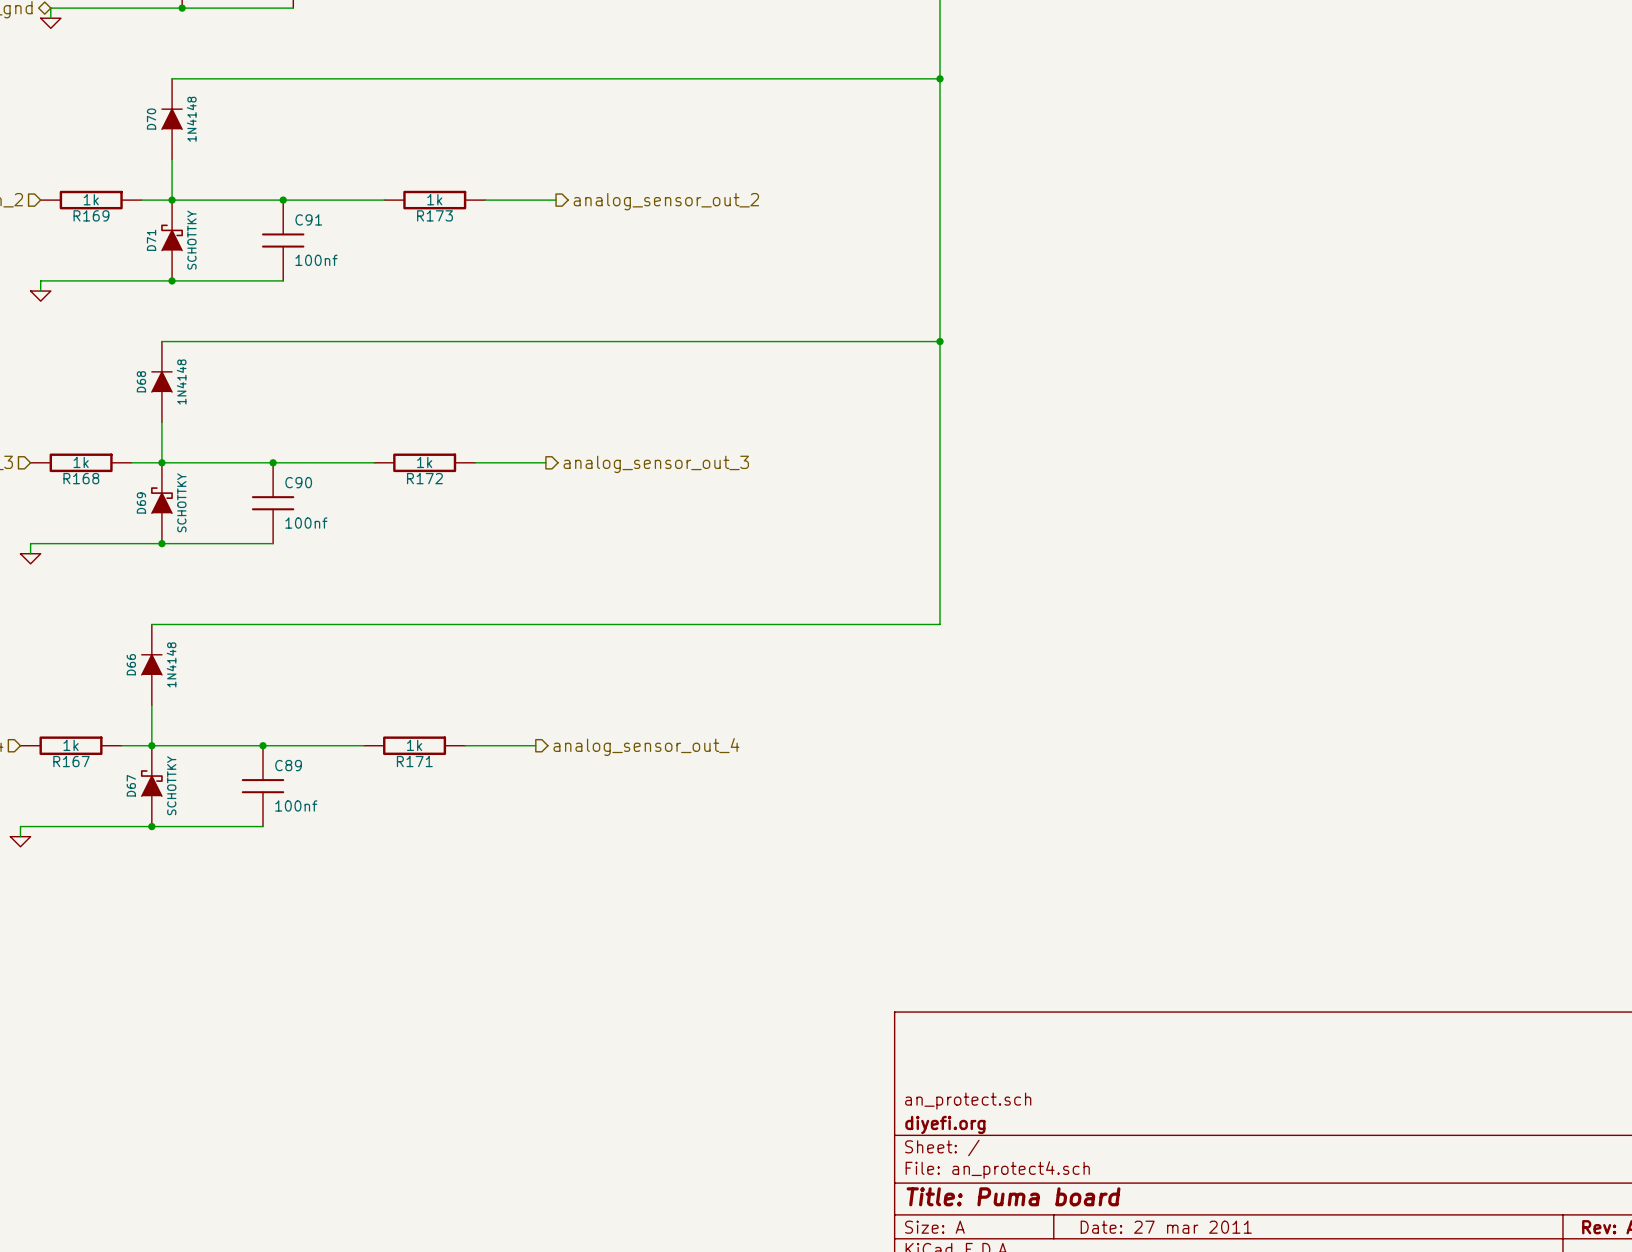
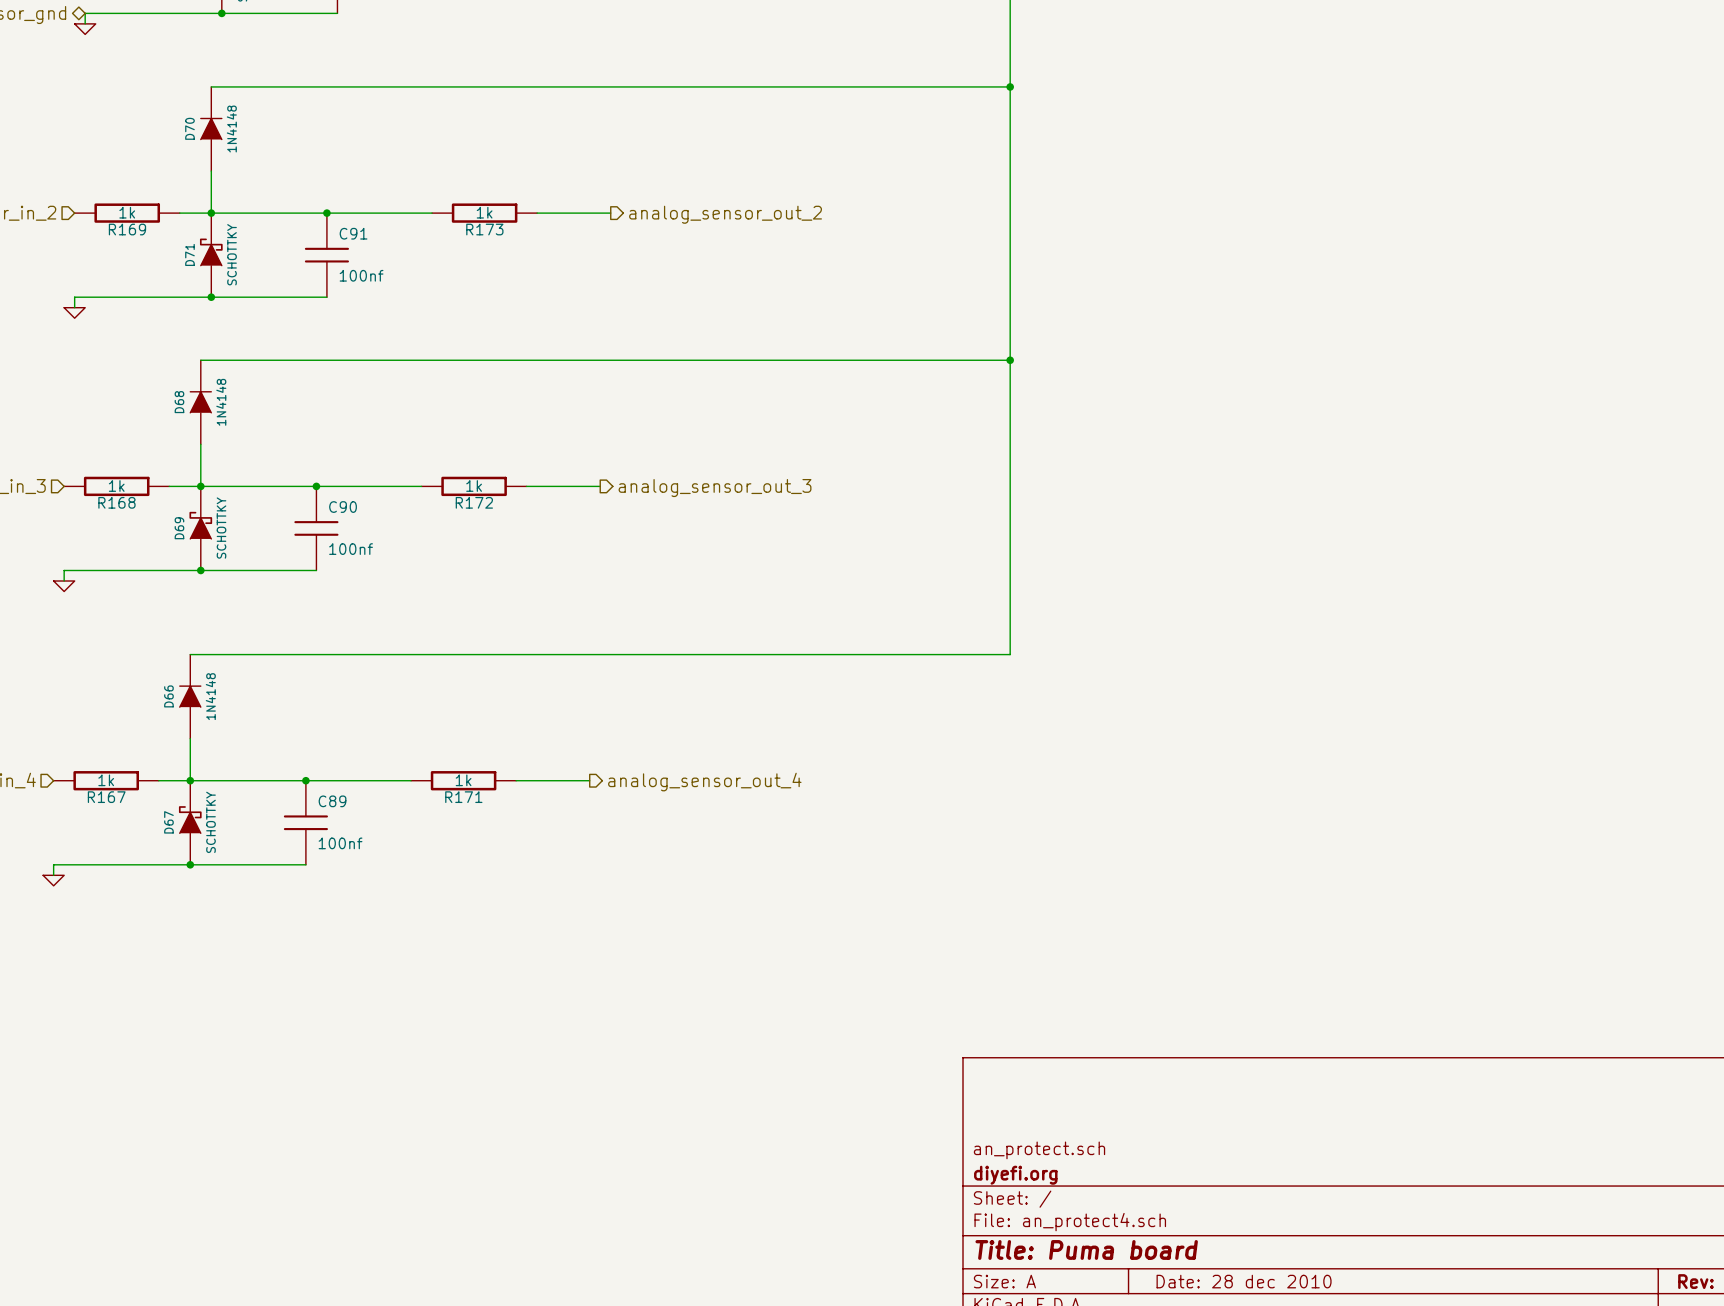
title block: Date: 27 mar 2011 (1166, 1227) -> Date: 28 dec 2010 (1244, 1281)

